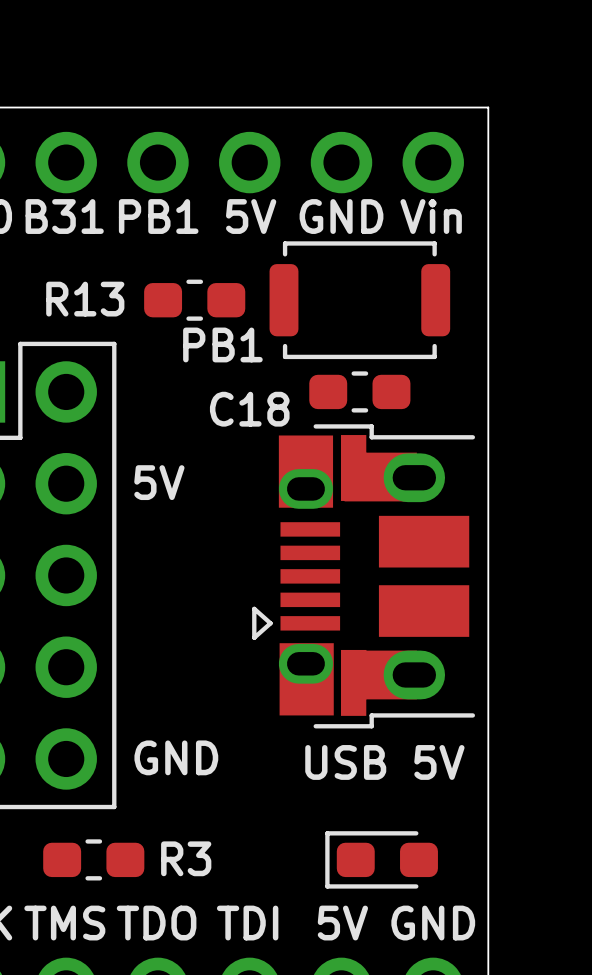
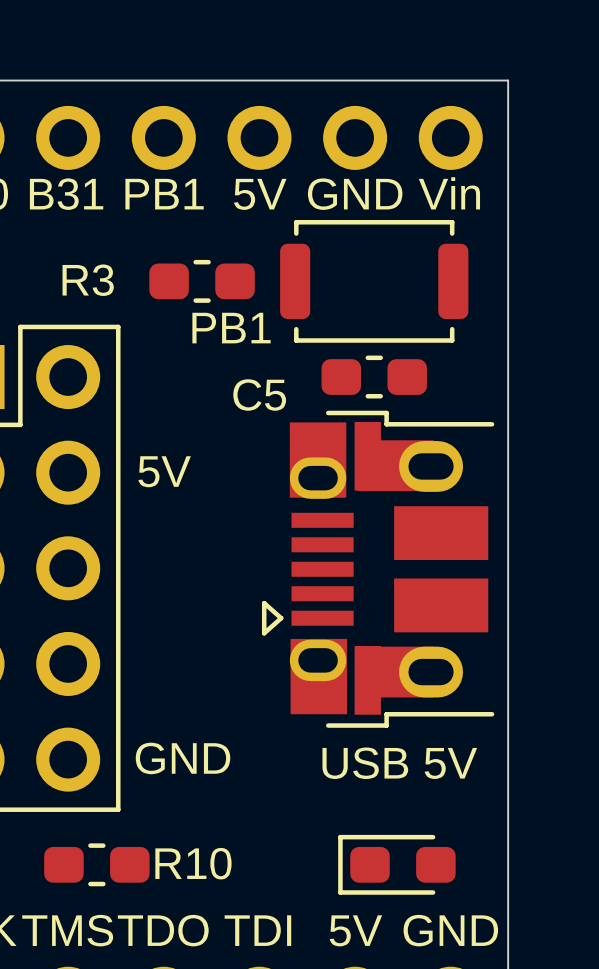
R13 name: R13 (85, 299) -> R3 (88, 280)
C18 name: C18 (249, 409) -> C5 (259, 395)
R3 name: R3 (186, 858) -> R10 (193, 863)

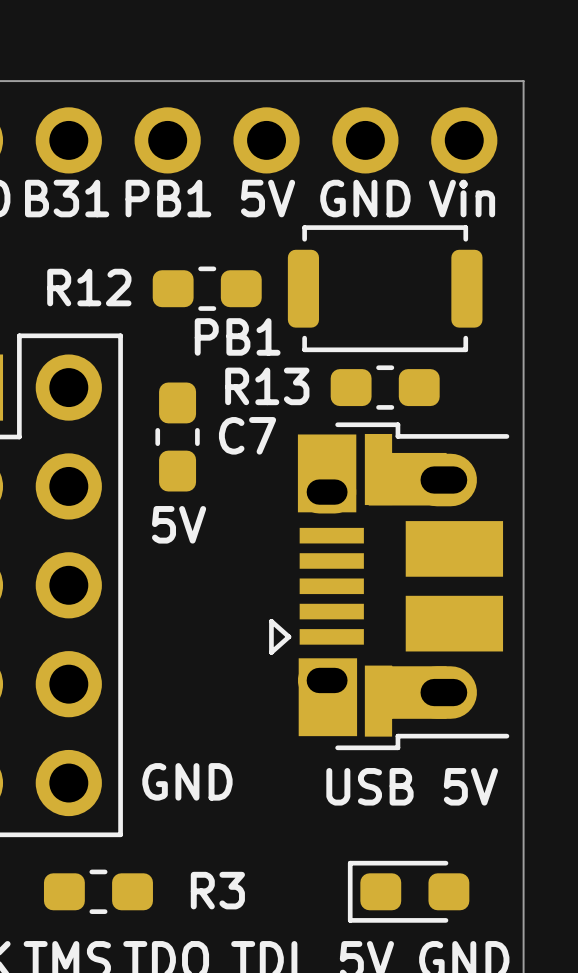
R3 name: R3 (88, 280) -> R12 (89, 287)
C5 name: C5 (259, 395) -> R13 (267, 386)
C7: none -> (177, 437)
text position: 5V (164, 471) -> 5V (179, 524)
R10 name: R10 (193, 863) -> R3 (217, 890)

